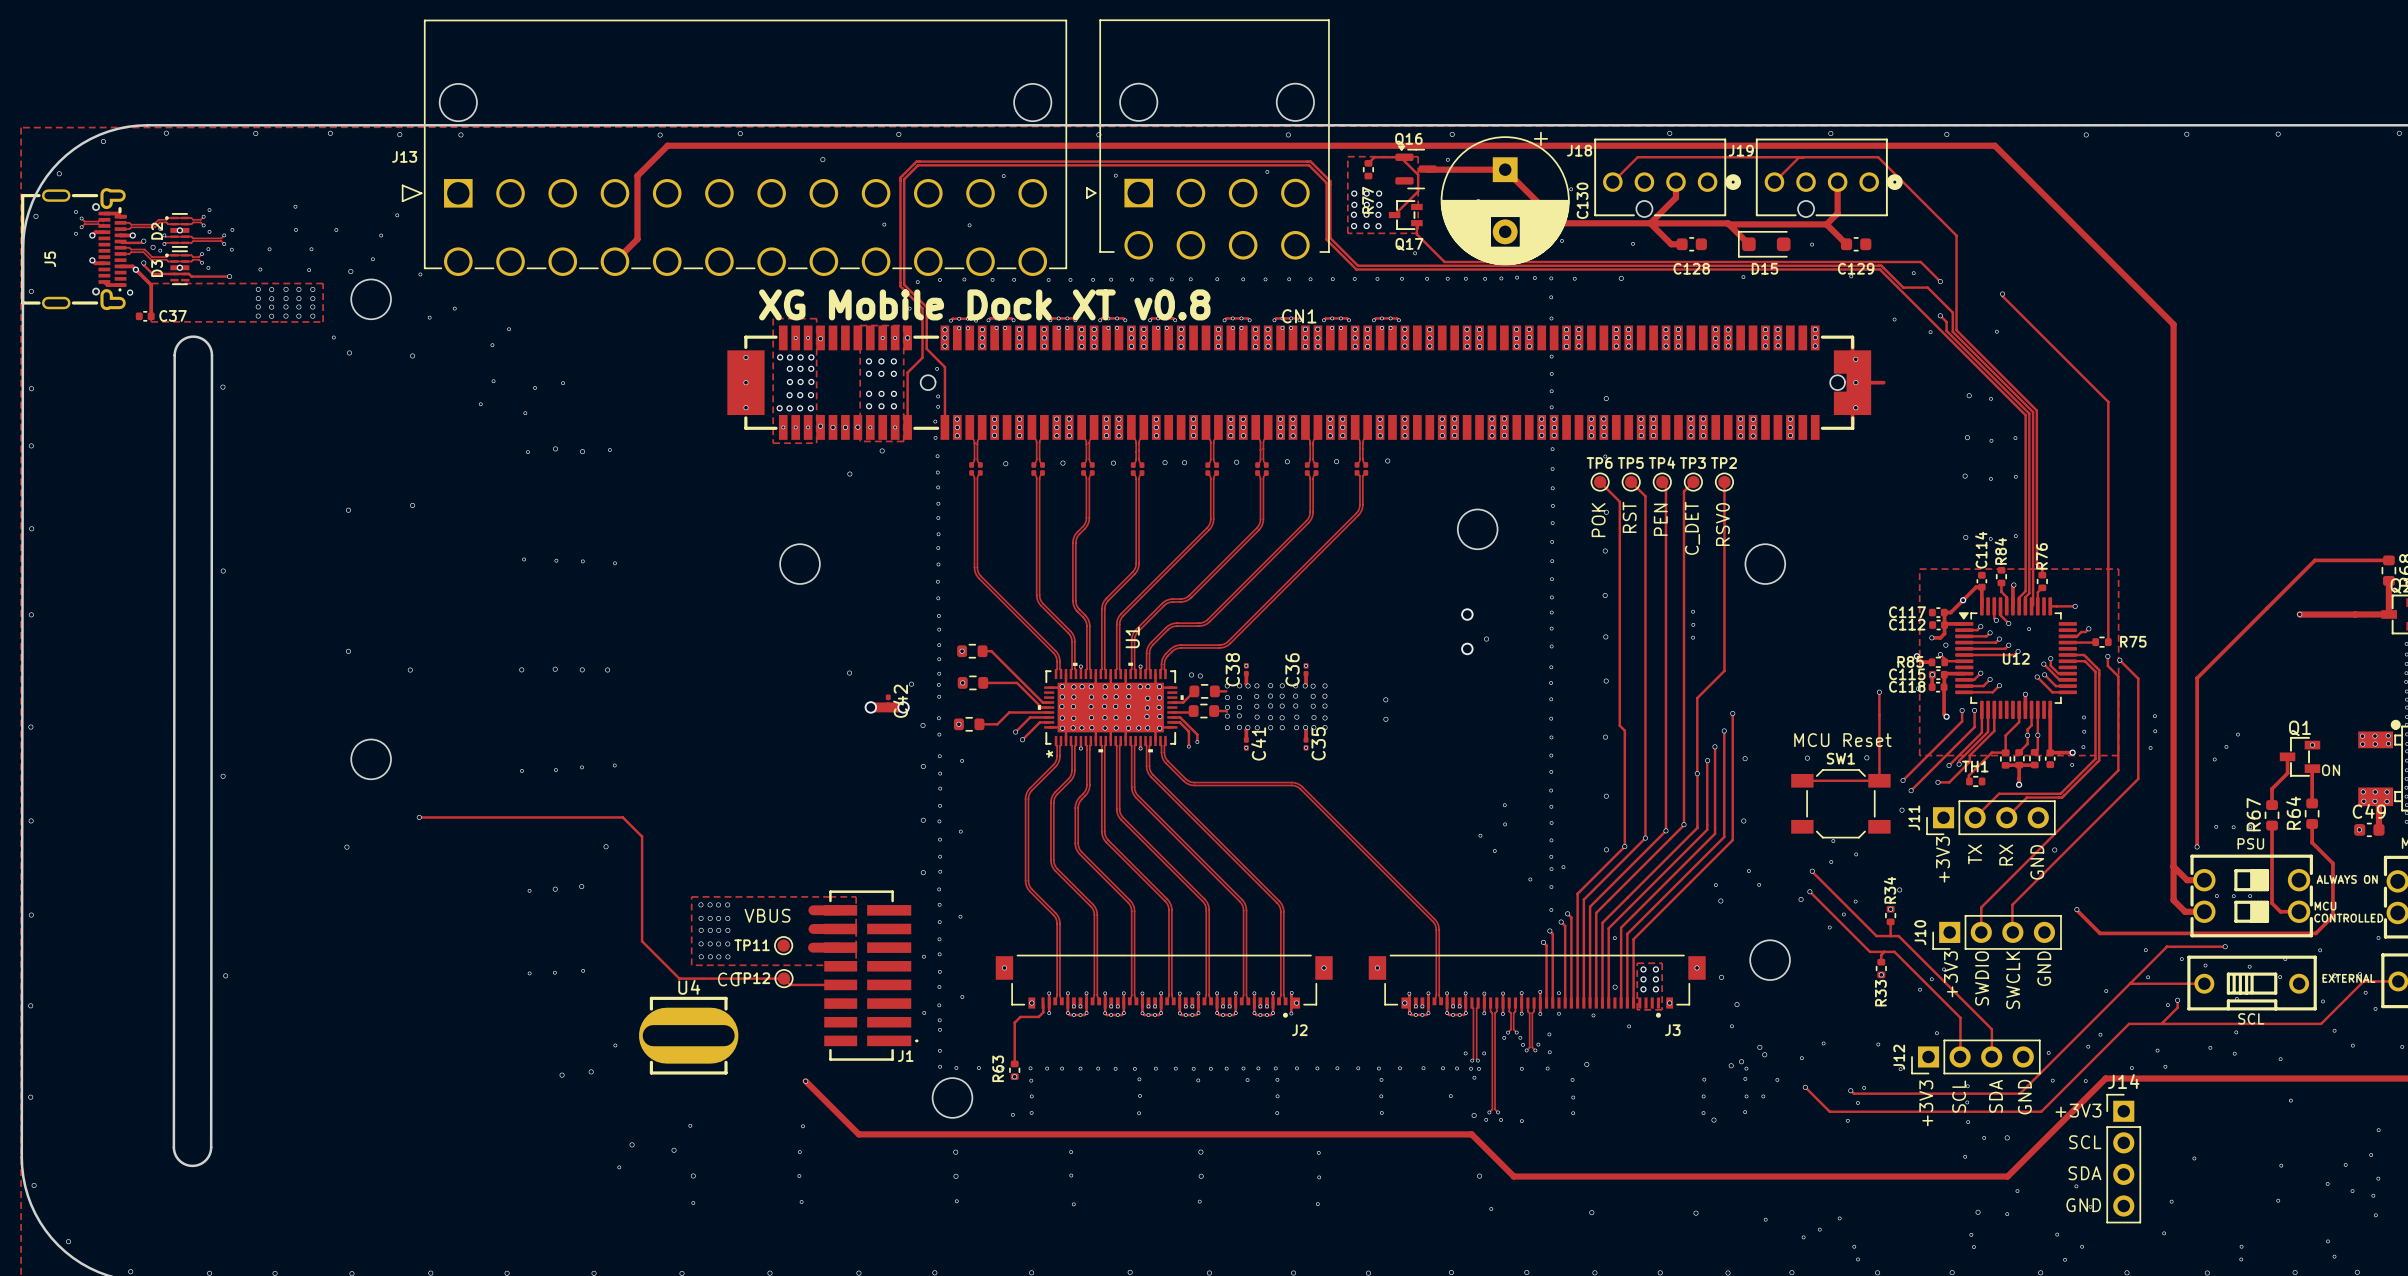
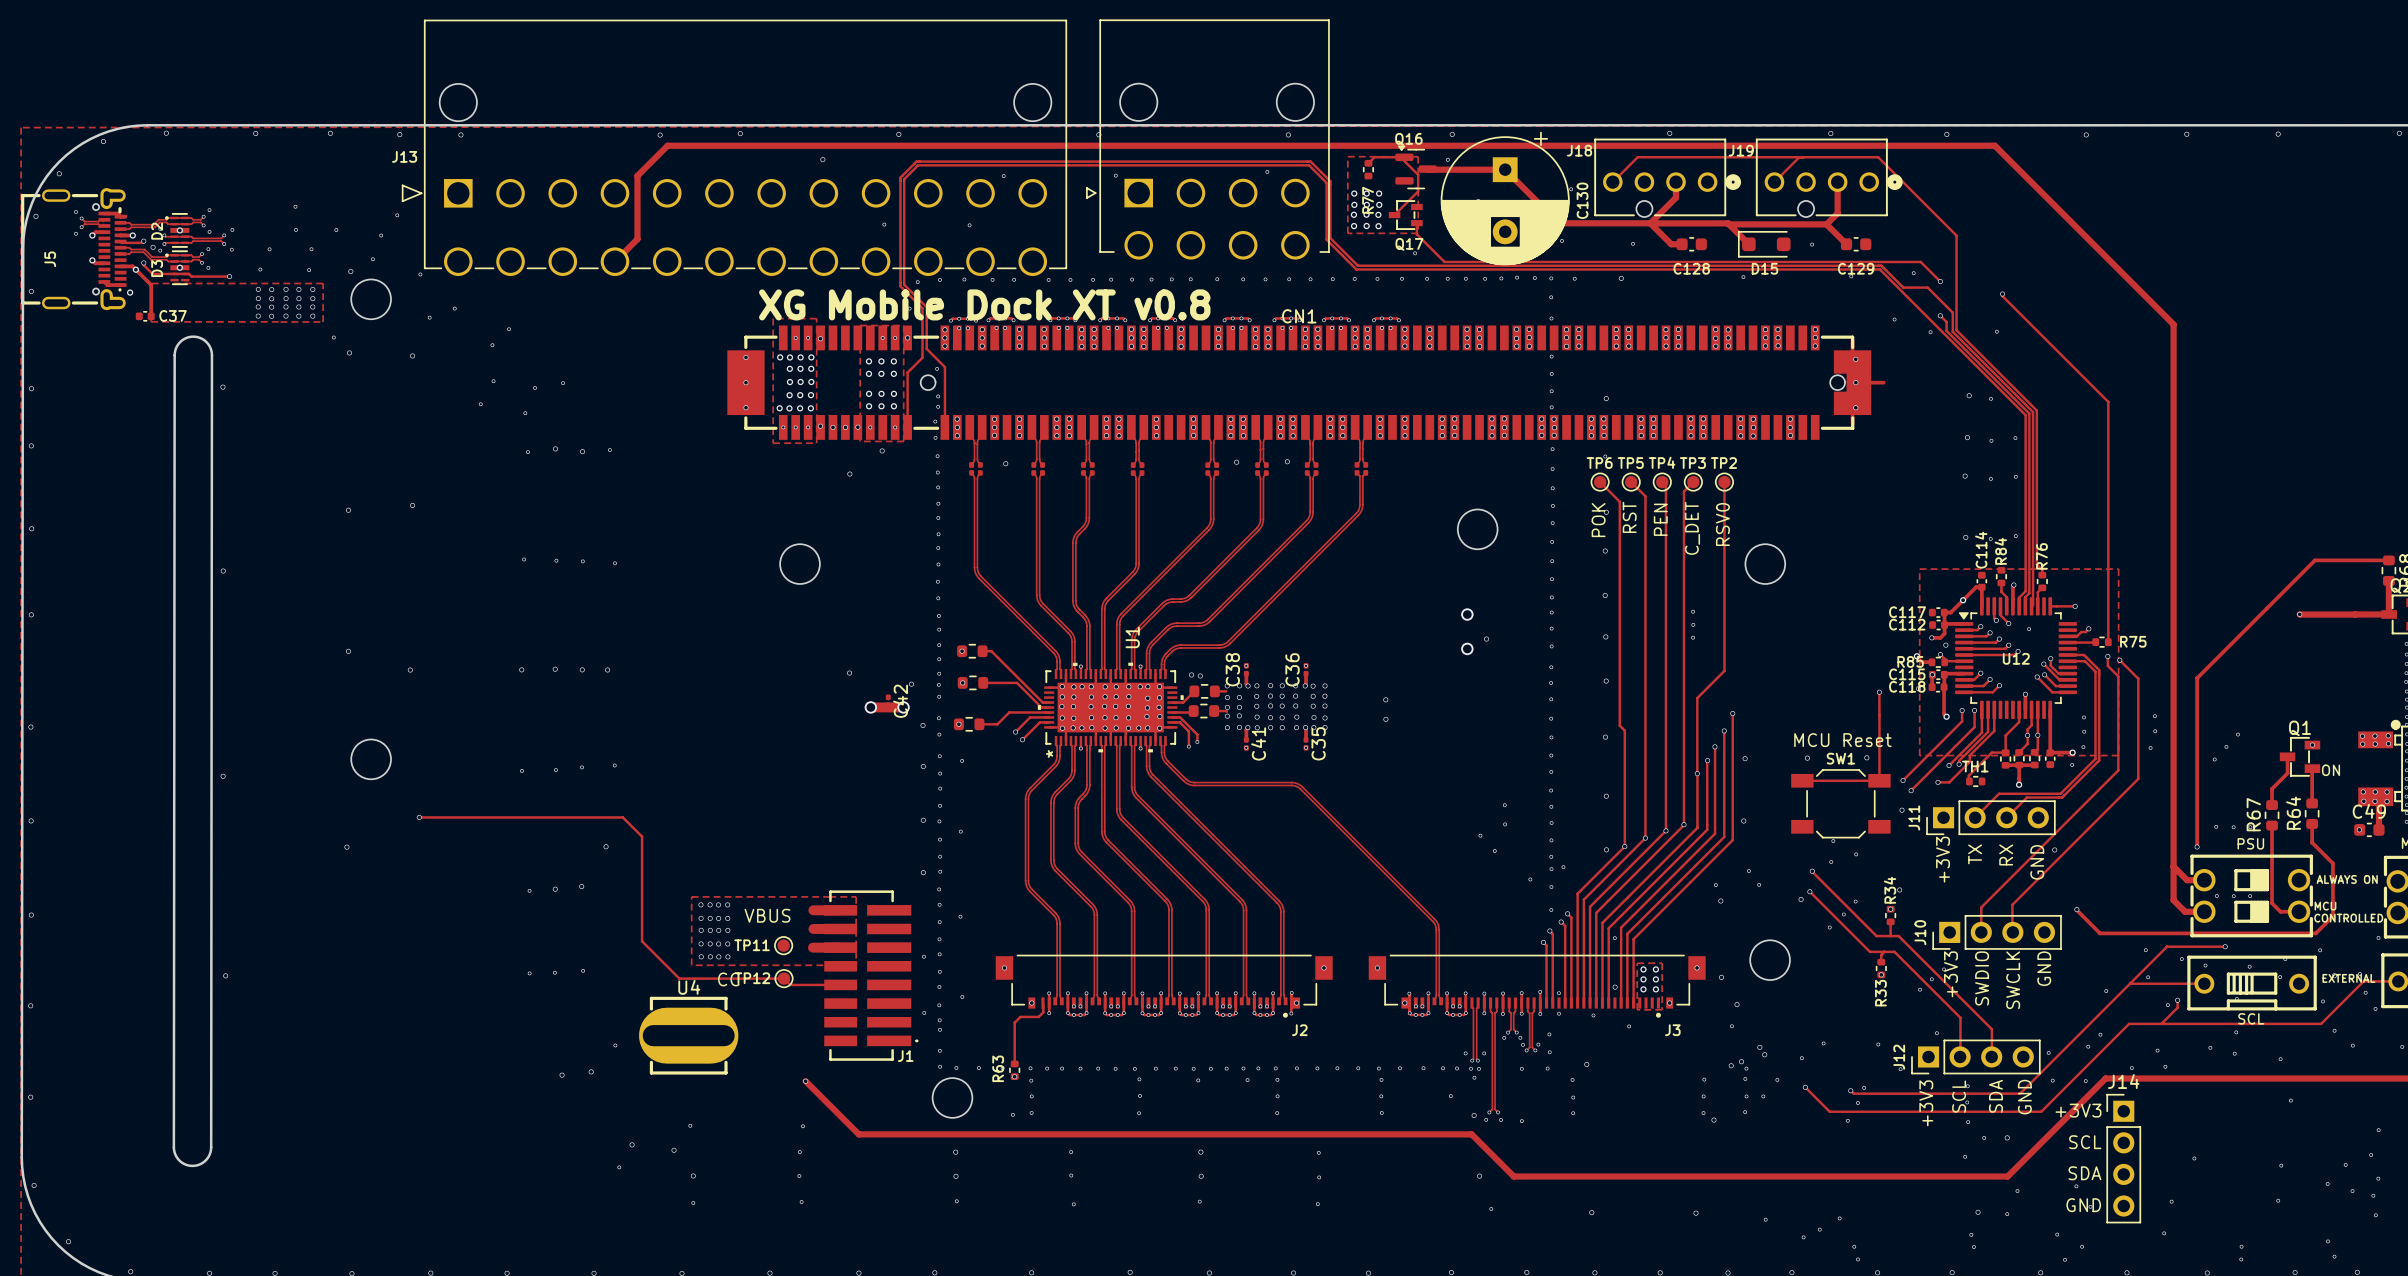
via: (1387, 460) -> none
via: (1336, 461) -> none
via: (1165, 462) -> none
via: (1184, 462) -> none
via: (1062, 463) -> none
via: (1113, 463) -> none

